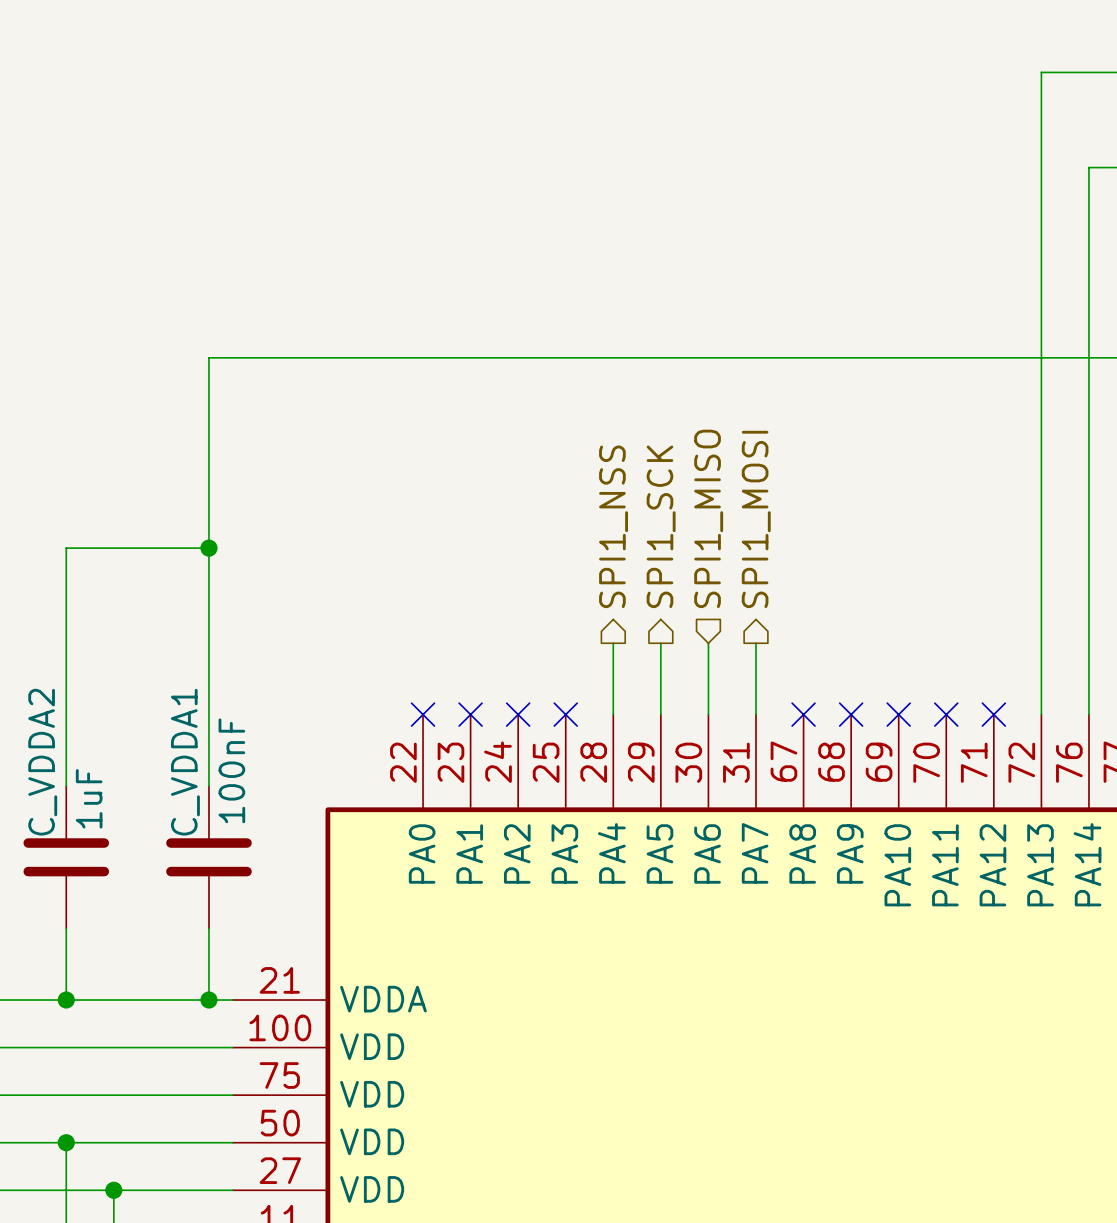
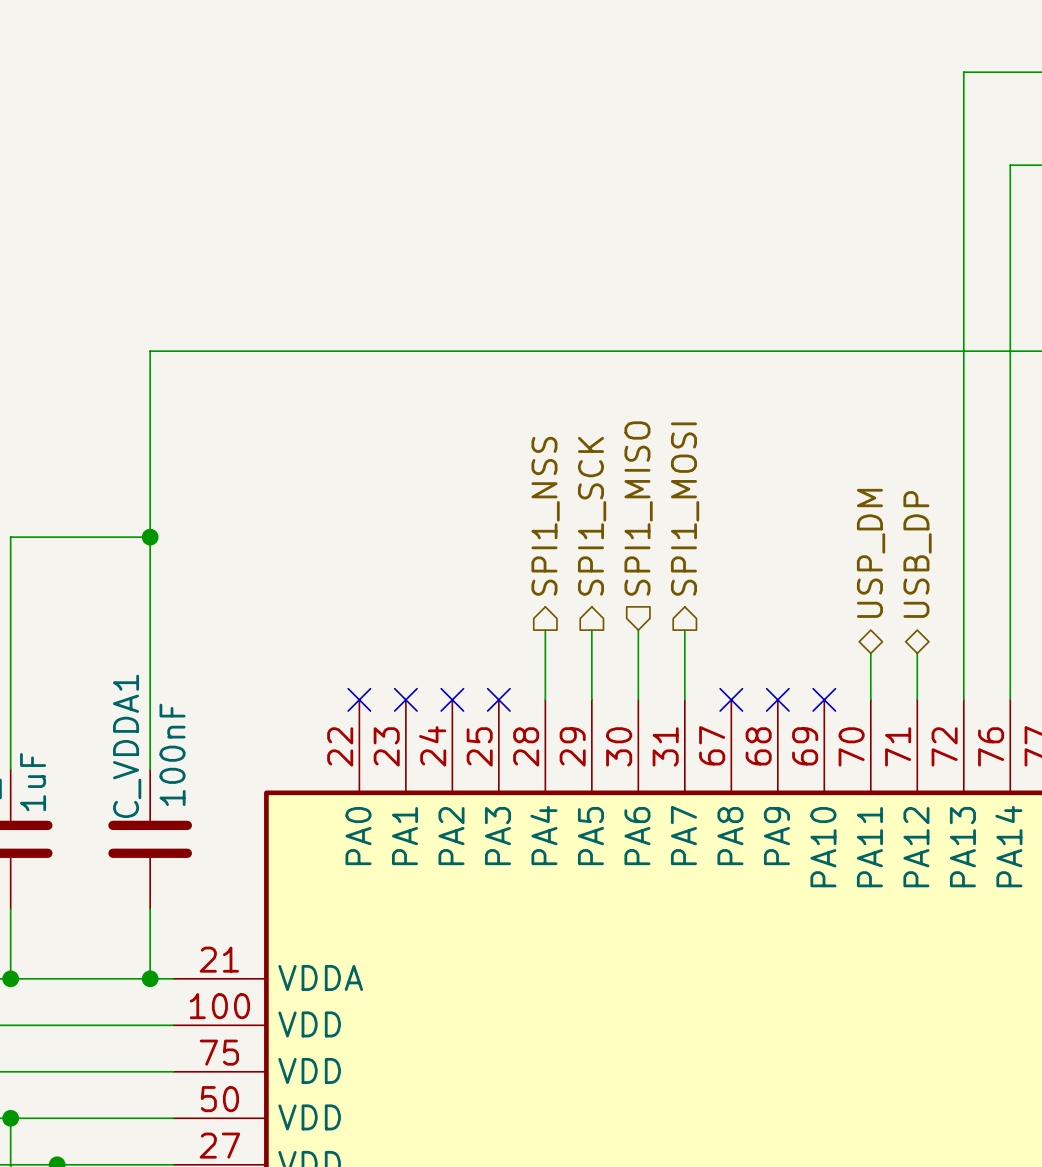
hierarchical label: none -> USP_DM (871, 553)
hierarchical label: none -> USB_DP (917, 554)
wire: none -> (870, 653) (870, 699)
wire: none -> (917, 653) (917, 699)
no-connect mark: (946, 714) -> none
no-connect mark: (993, 714) -> none

